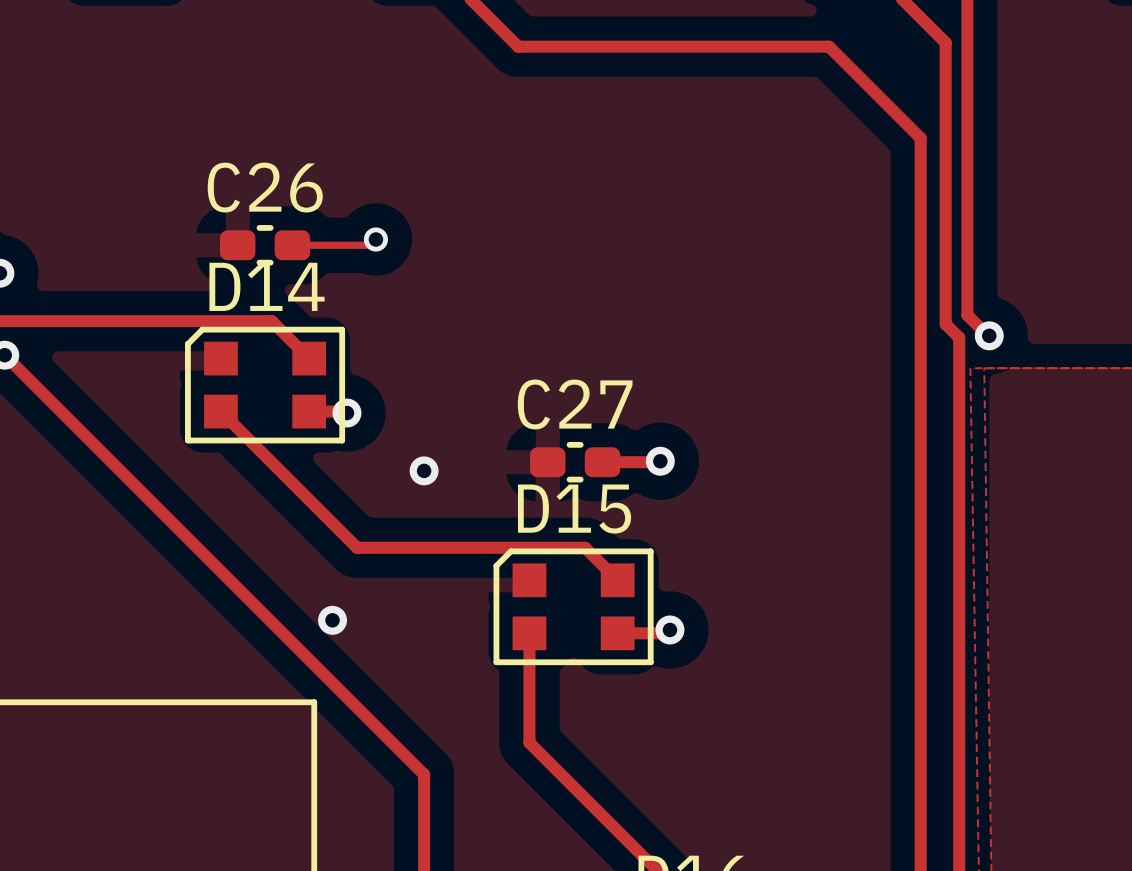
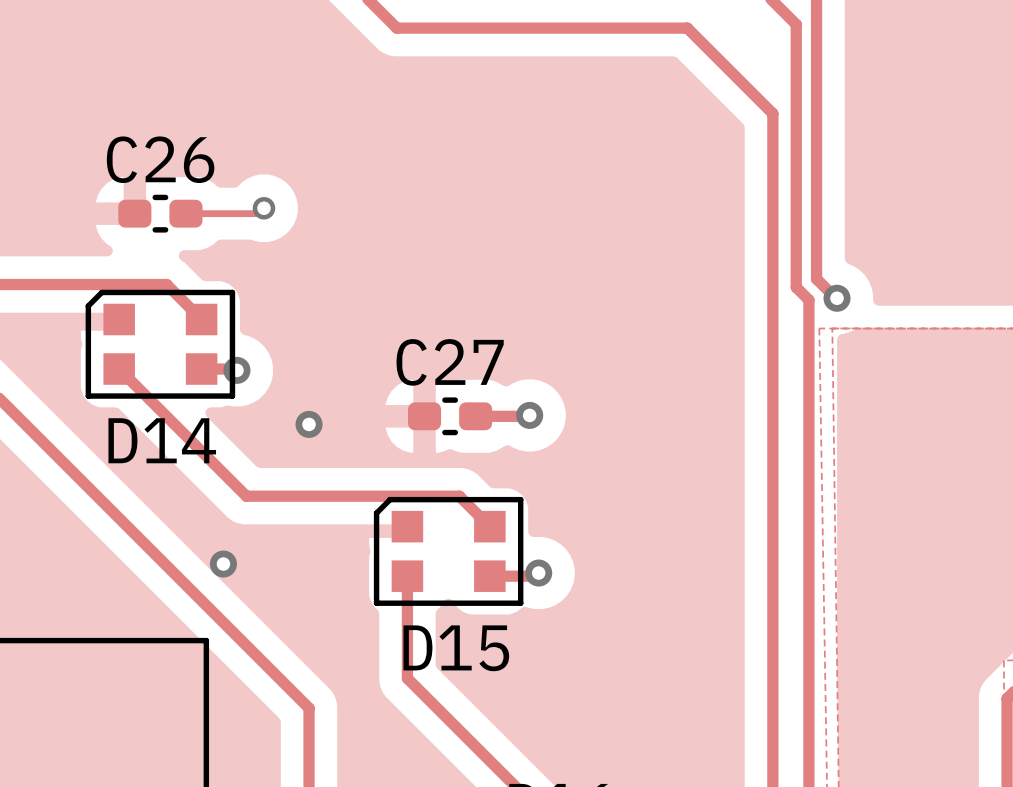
D14 name position: D14 (267, 286) -> D14 (162, 440)
D15 name position: D15 (574, 509) -> D15 (456, 648)

